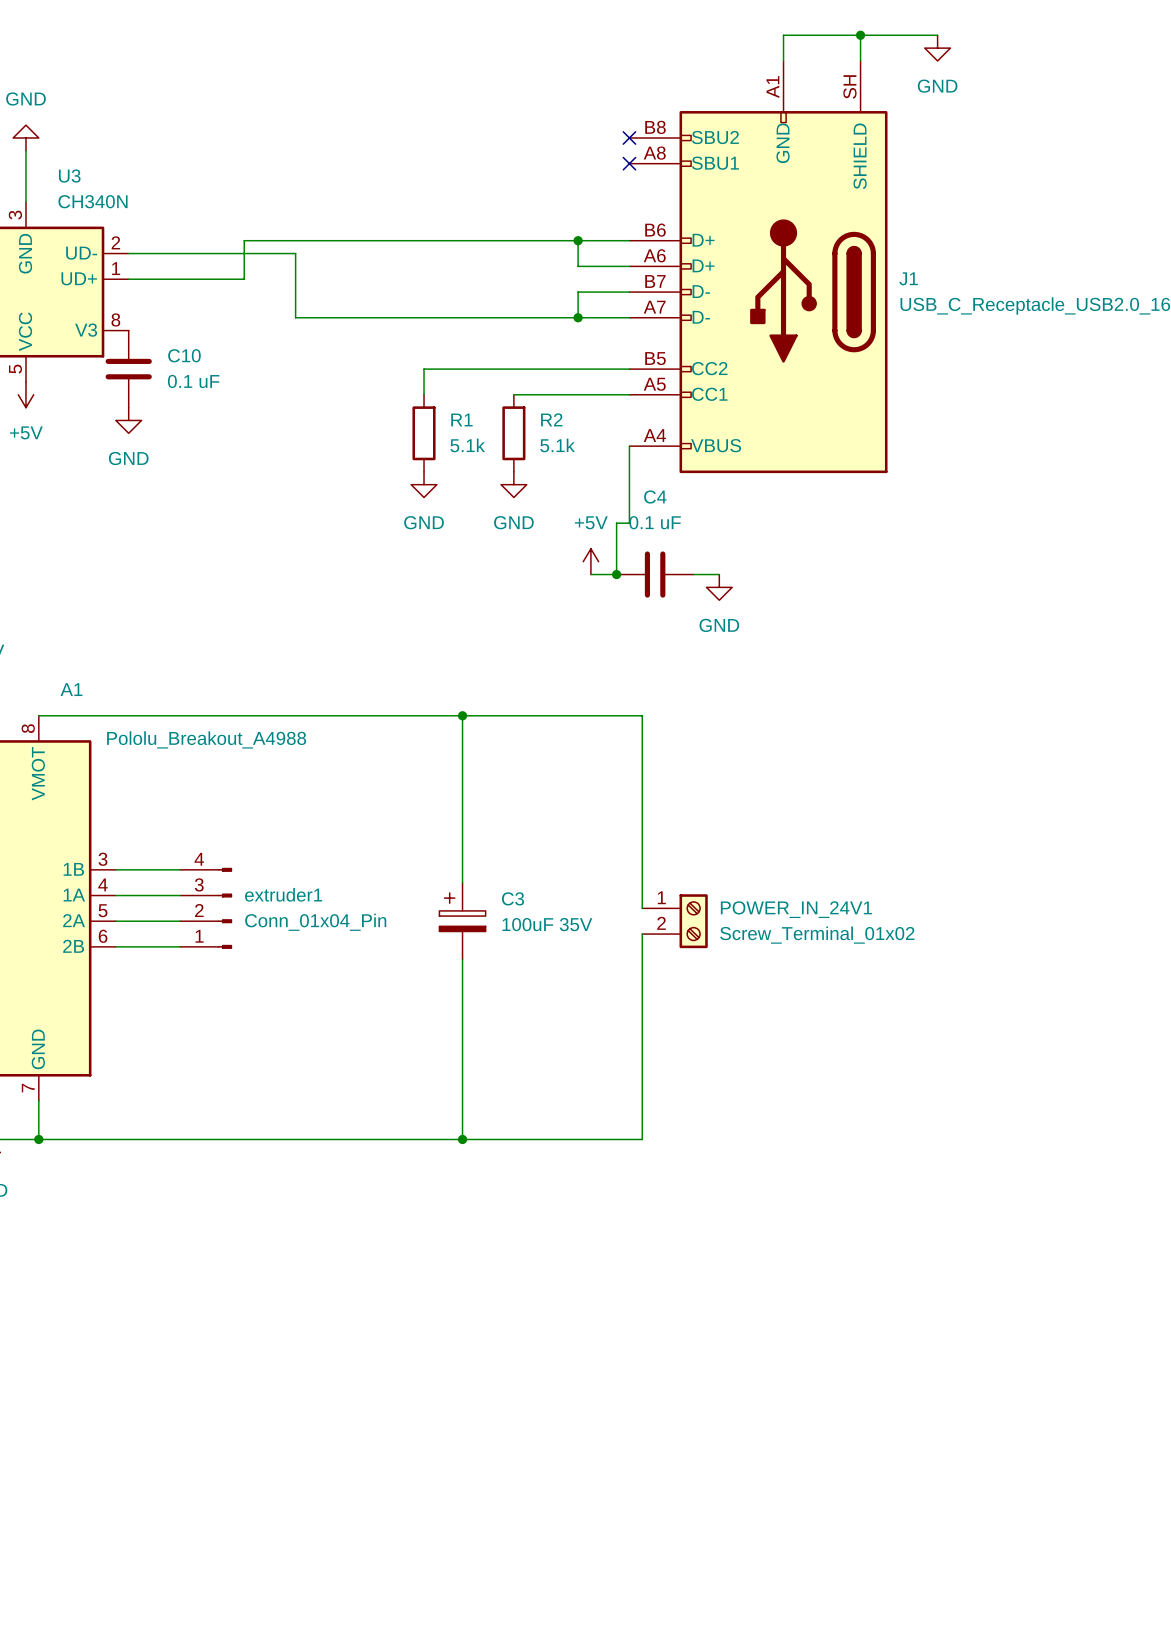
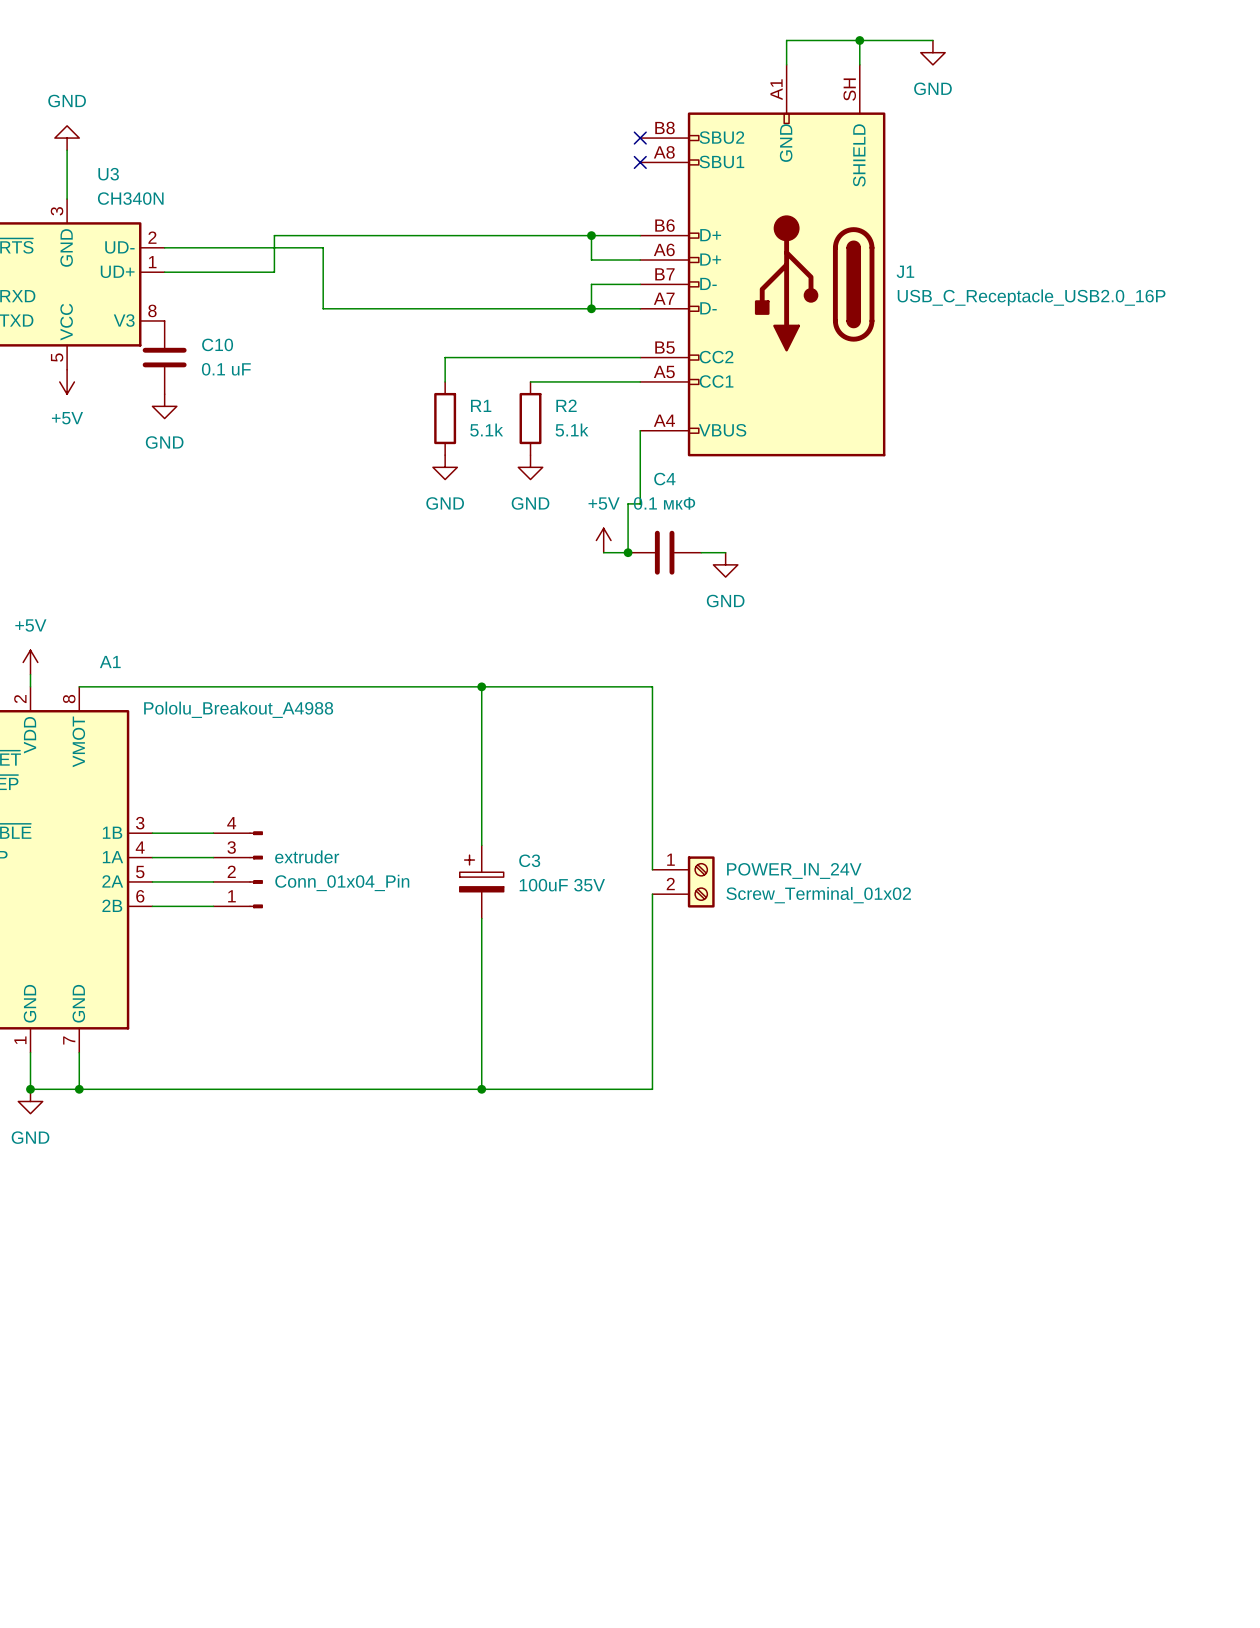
C4 value: 0.1 uF (655, 522) -> 0.1 мкФ (664, 503)
extruder1 name: extruder1 (283, 894) -> extruder (307, 856)
POWER_IN_24V1 name: POWER_IN_24V1 (796, 909) -> POWER_IN_24V (794, 870)

